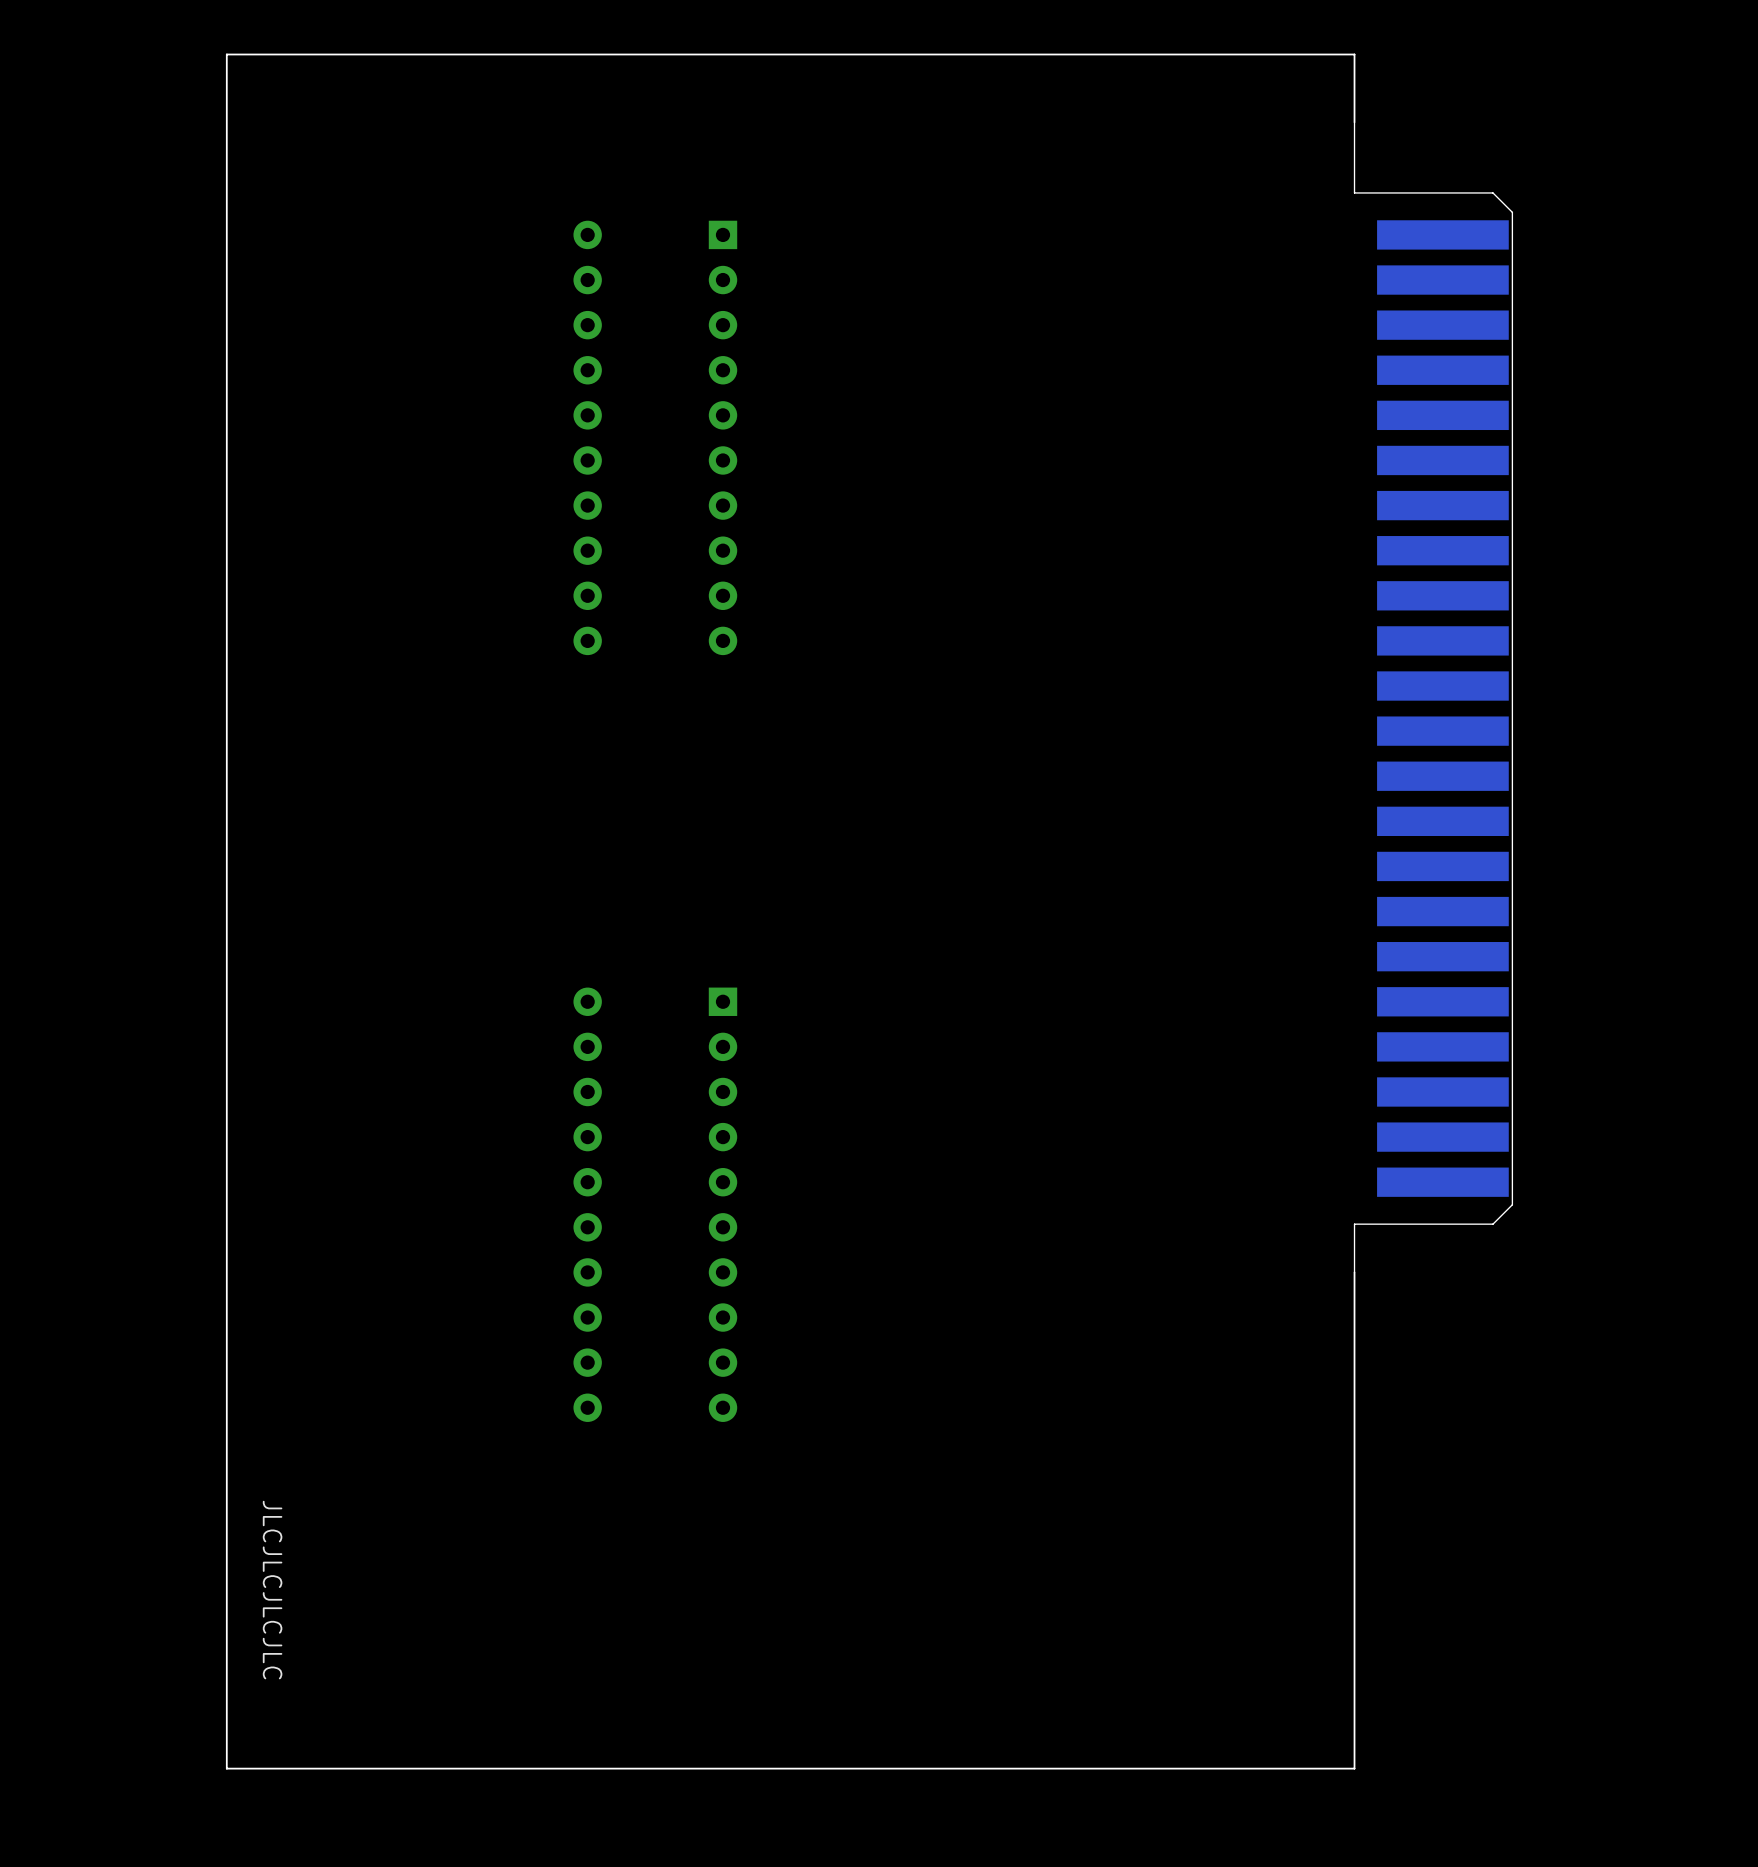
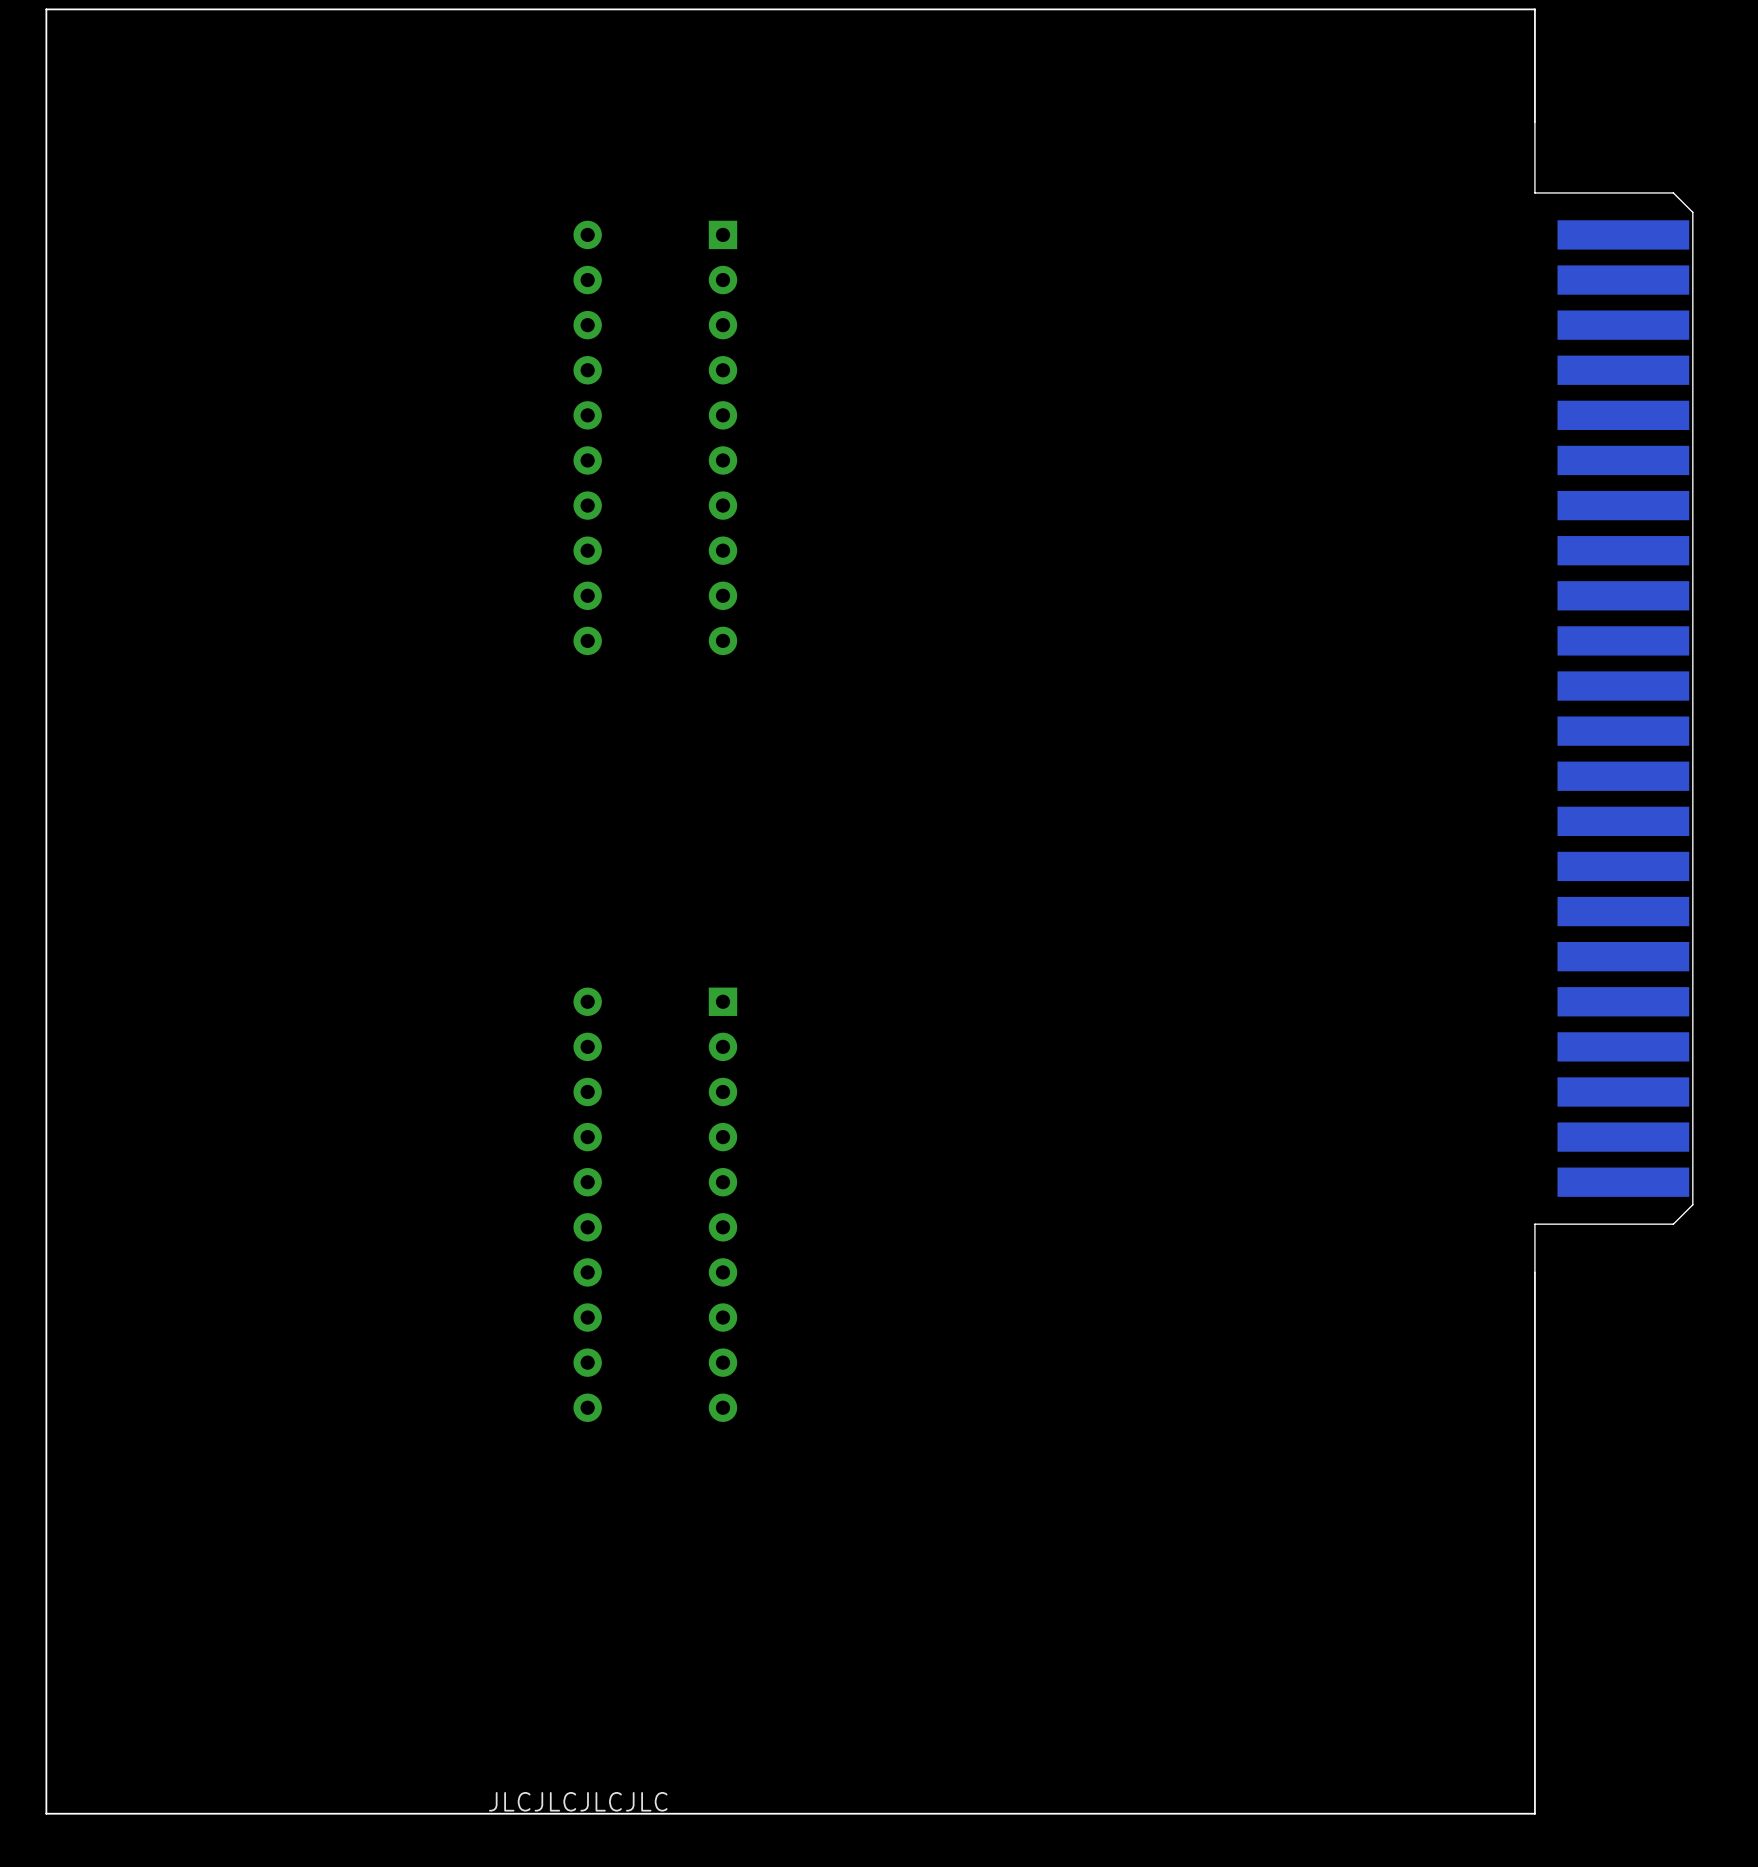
board edge: (1354, 122) (1354, 54) (226, 54) (226, 1768) (1354, 1768) (1354, 1272) -> none
board edge: none -> (1534, 122) (1534, 9) (46, 9) (46, 1813) (1534, 1813) (1534, 1272)
part position: (1433, 697) -> (1613, 697)
text rotation: 0° (272, 1590) -> 90° counterclockwise (578, 1801)
text position: JLCJLCJLCJLC (272, 1590) -> JLCJLCJLCJLC (578, 1801)

